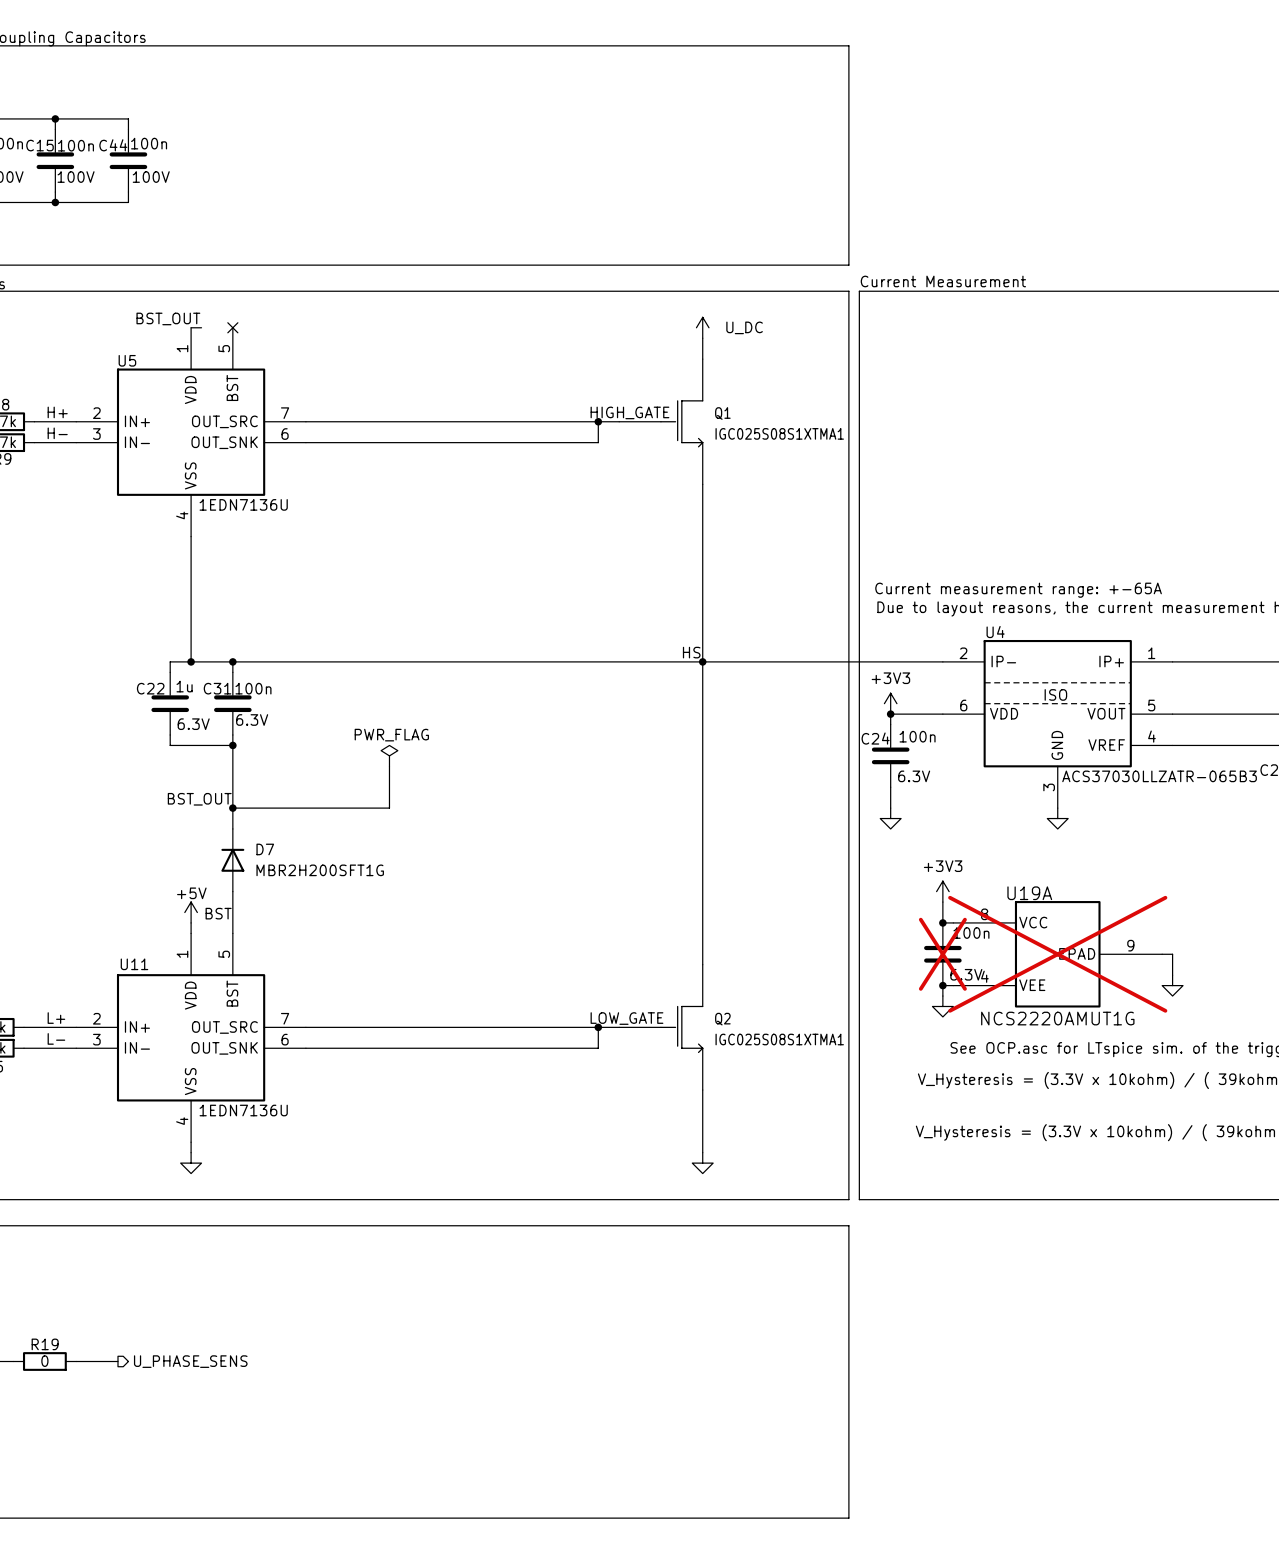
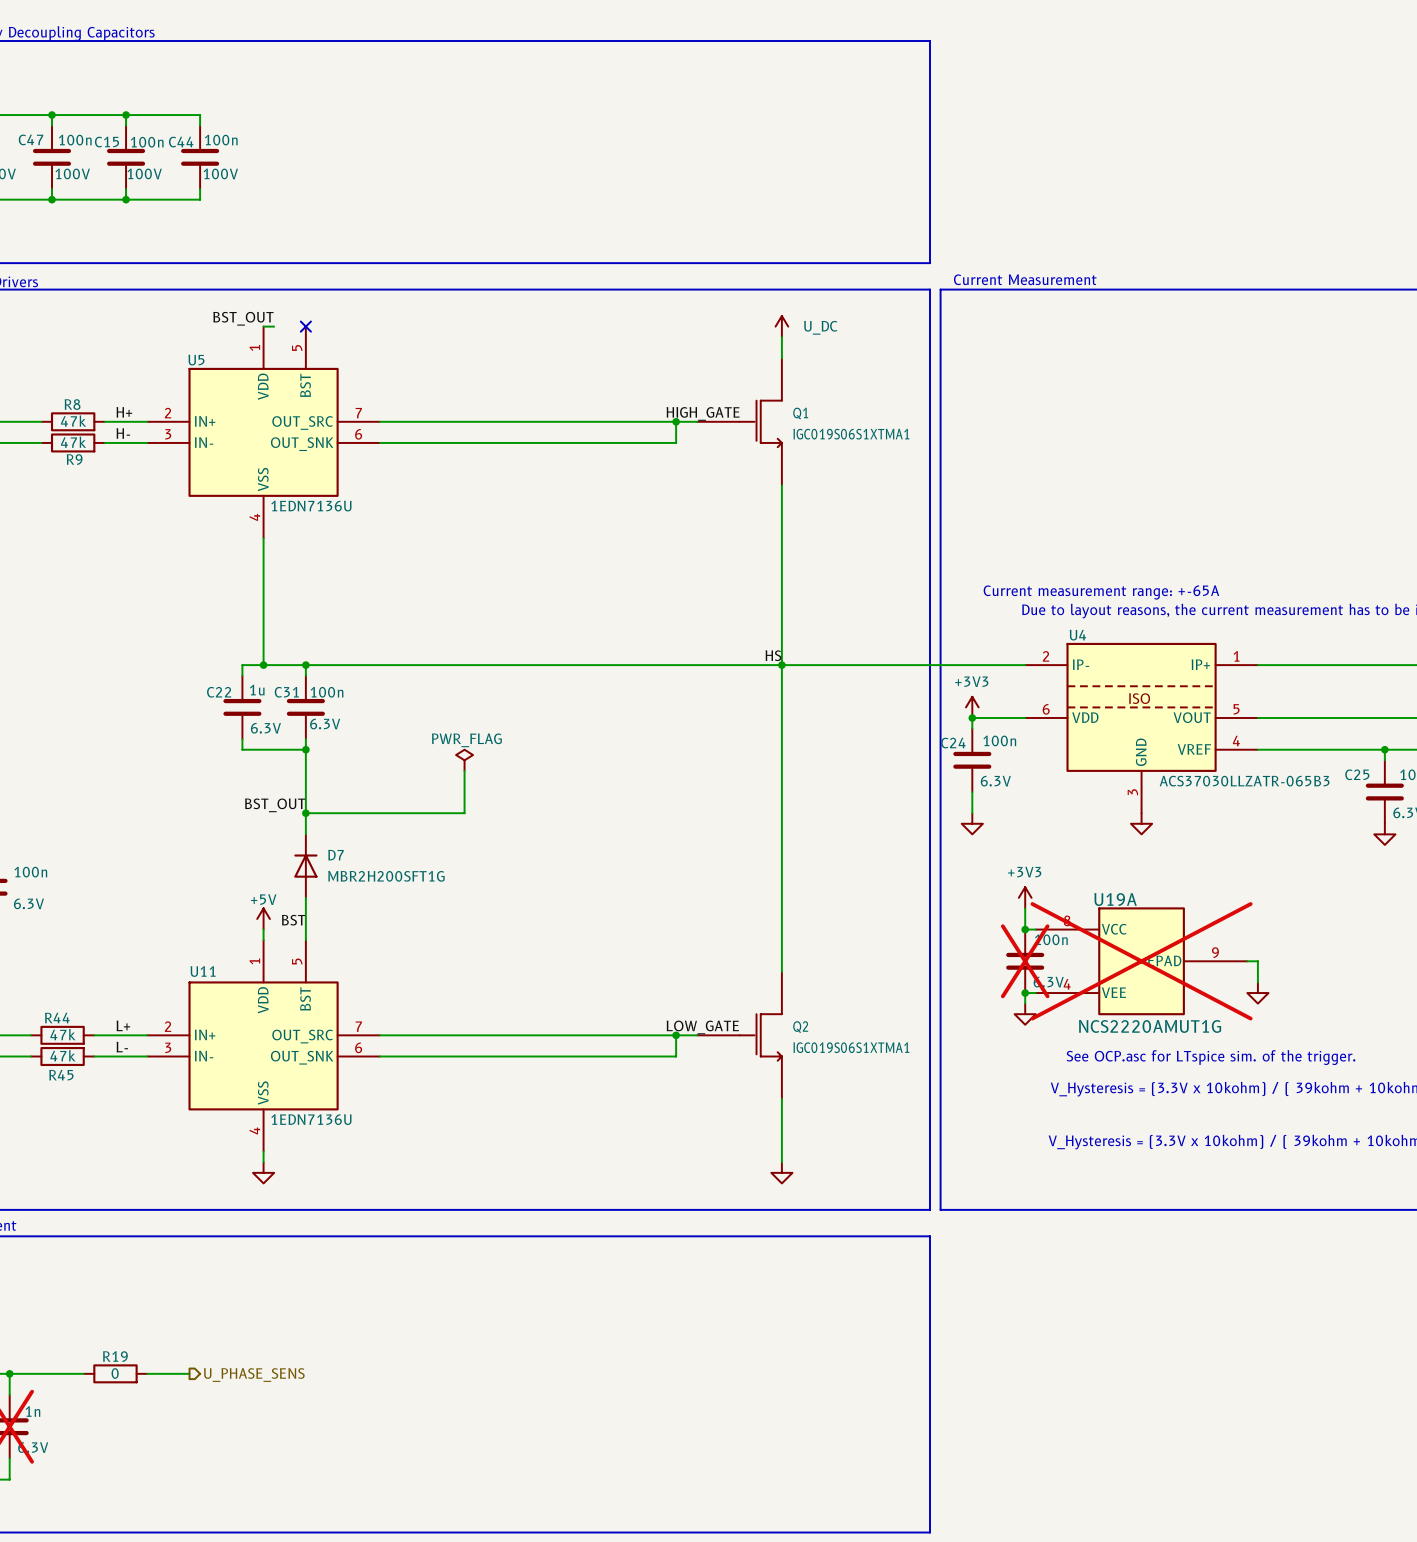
Q1 value: IGC025S08S1XTMA1 (779, 433) -> IGC019S06S1XTMA1 (851, 434)
Q2 value: IGC025S08S1XTMA1 (779, 1039) -> IGC019S06S1XTMA1 (851, 1047)

